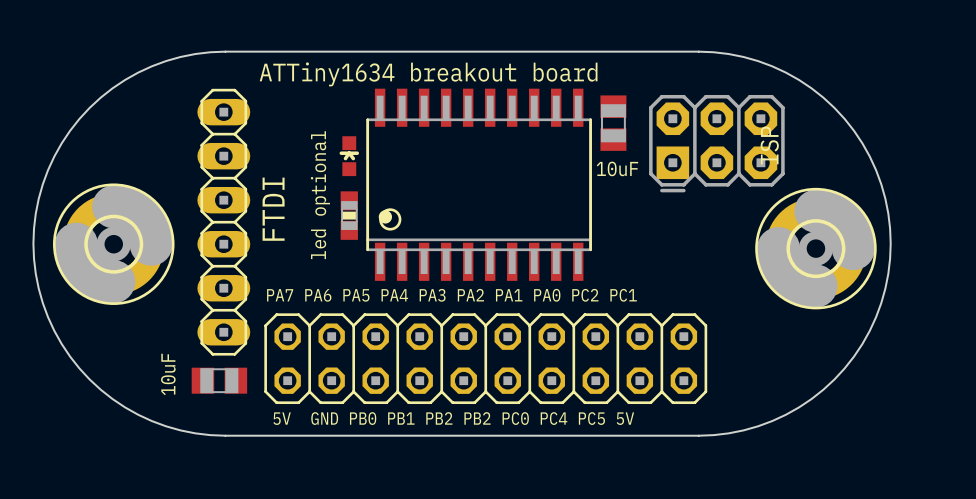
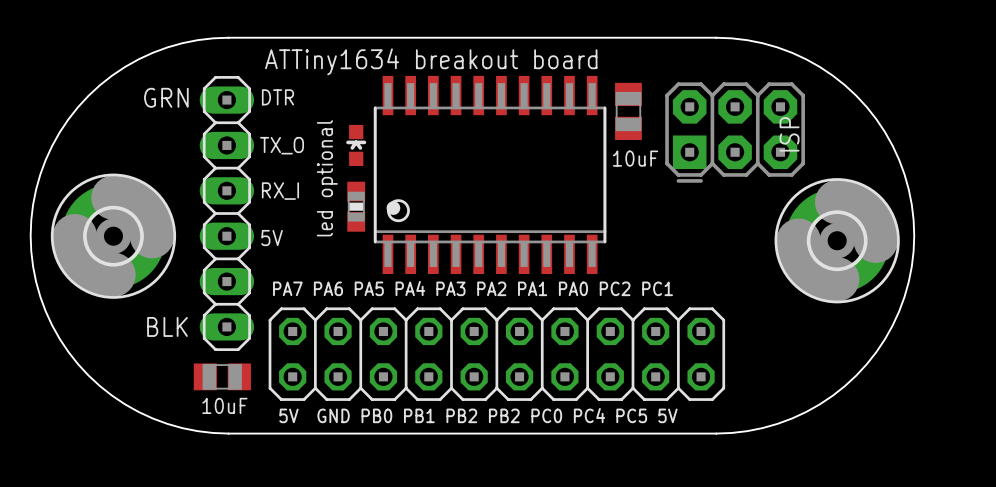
text: none -> GRN (166, 97)
text: none -> DTR (277, 97)
text: none -> TX_O (282, 145)
text: none -> RX_I (280, 191)
FTDI name: FTDI (273, 209) -> none
text: none -> 5V (272, 238)
text: none -> BLK (167, 326)
text rotation: 0° (168, 374) -> 90° clockwise (224, 405)
text position: 10uF (168, 374) -> 10uF (224, 405)

